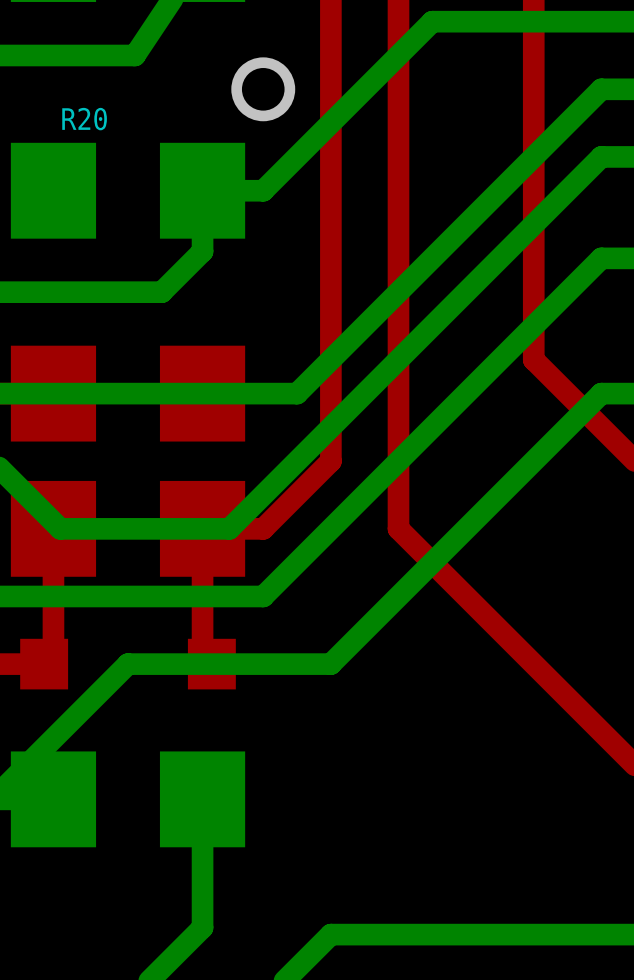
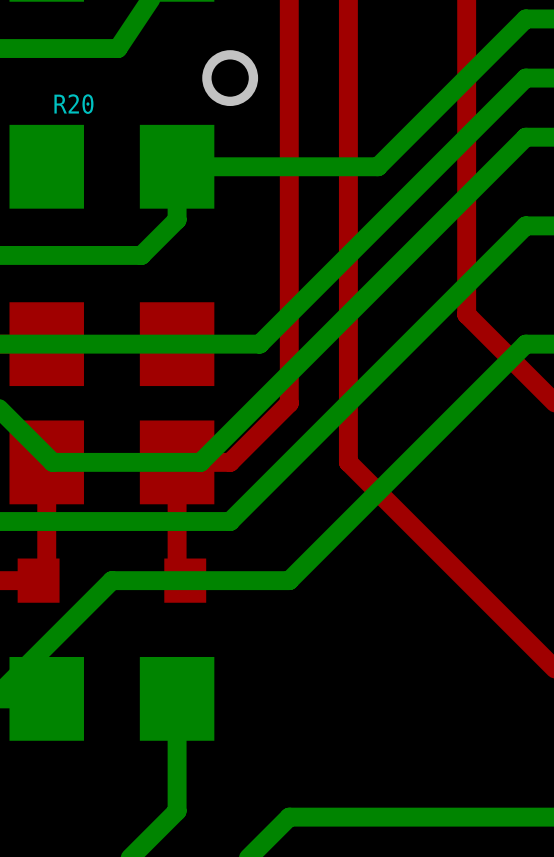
bottom track: (601, 21) (432, 21) (263, 190) -> (525, 18) (377, 166) (230, 166)

